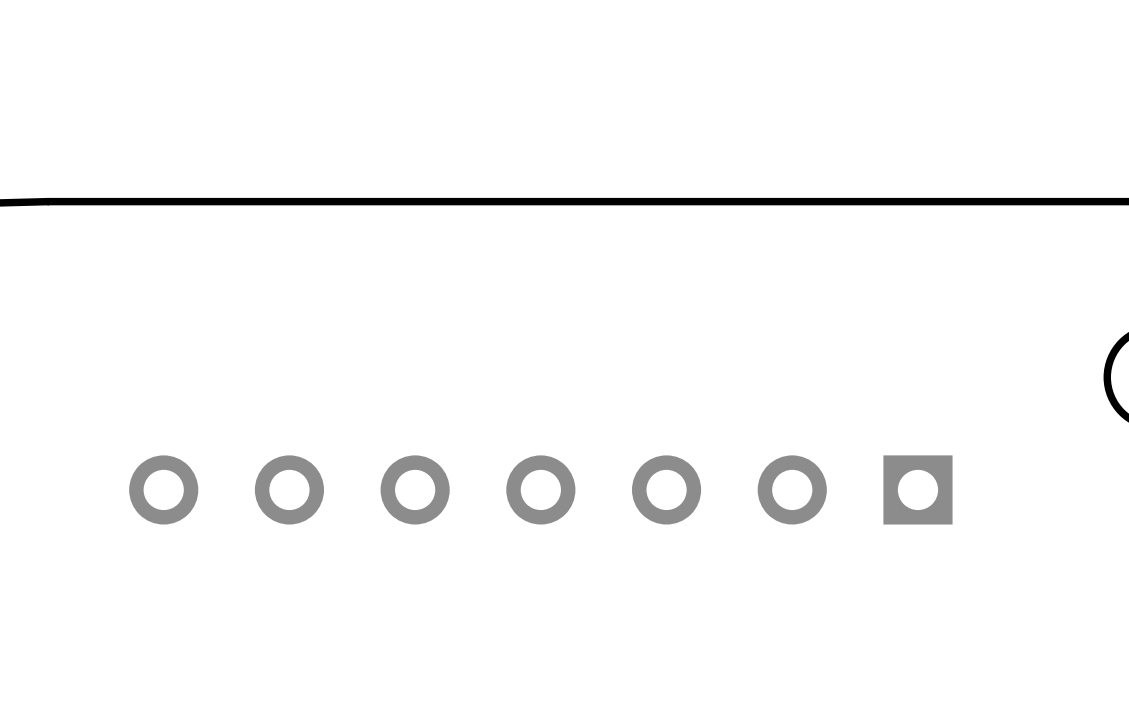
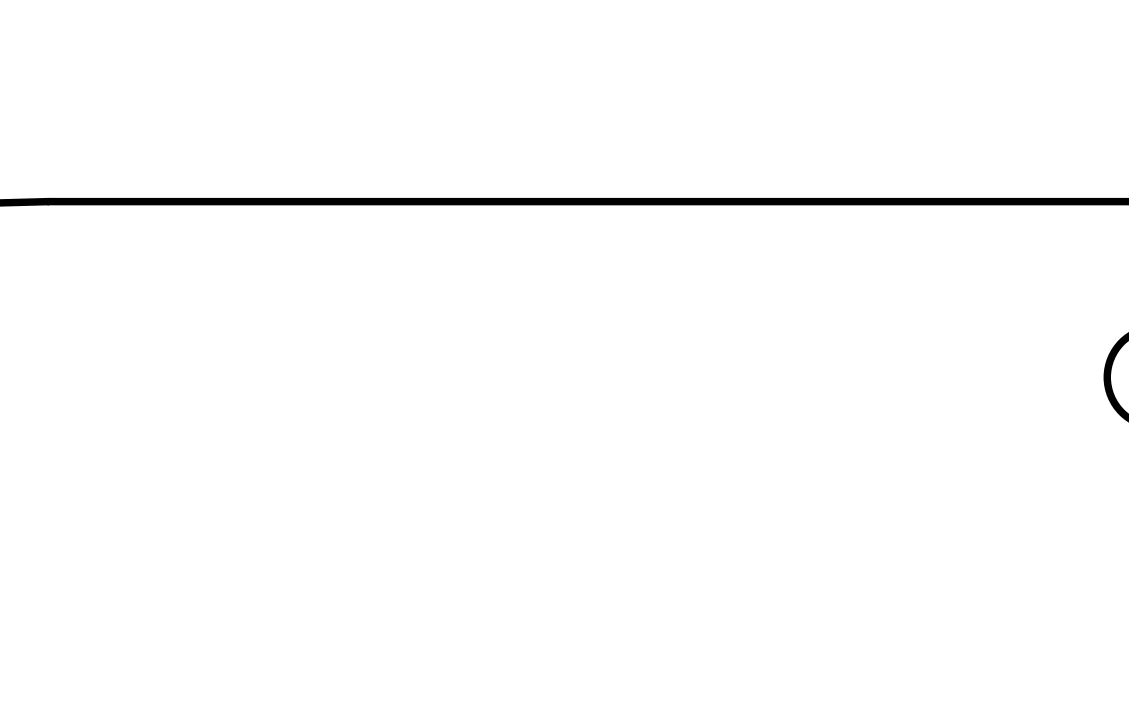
part: (540, 489) -> none

